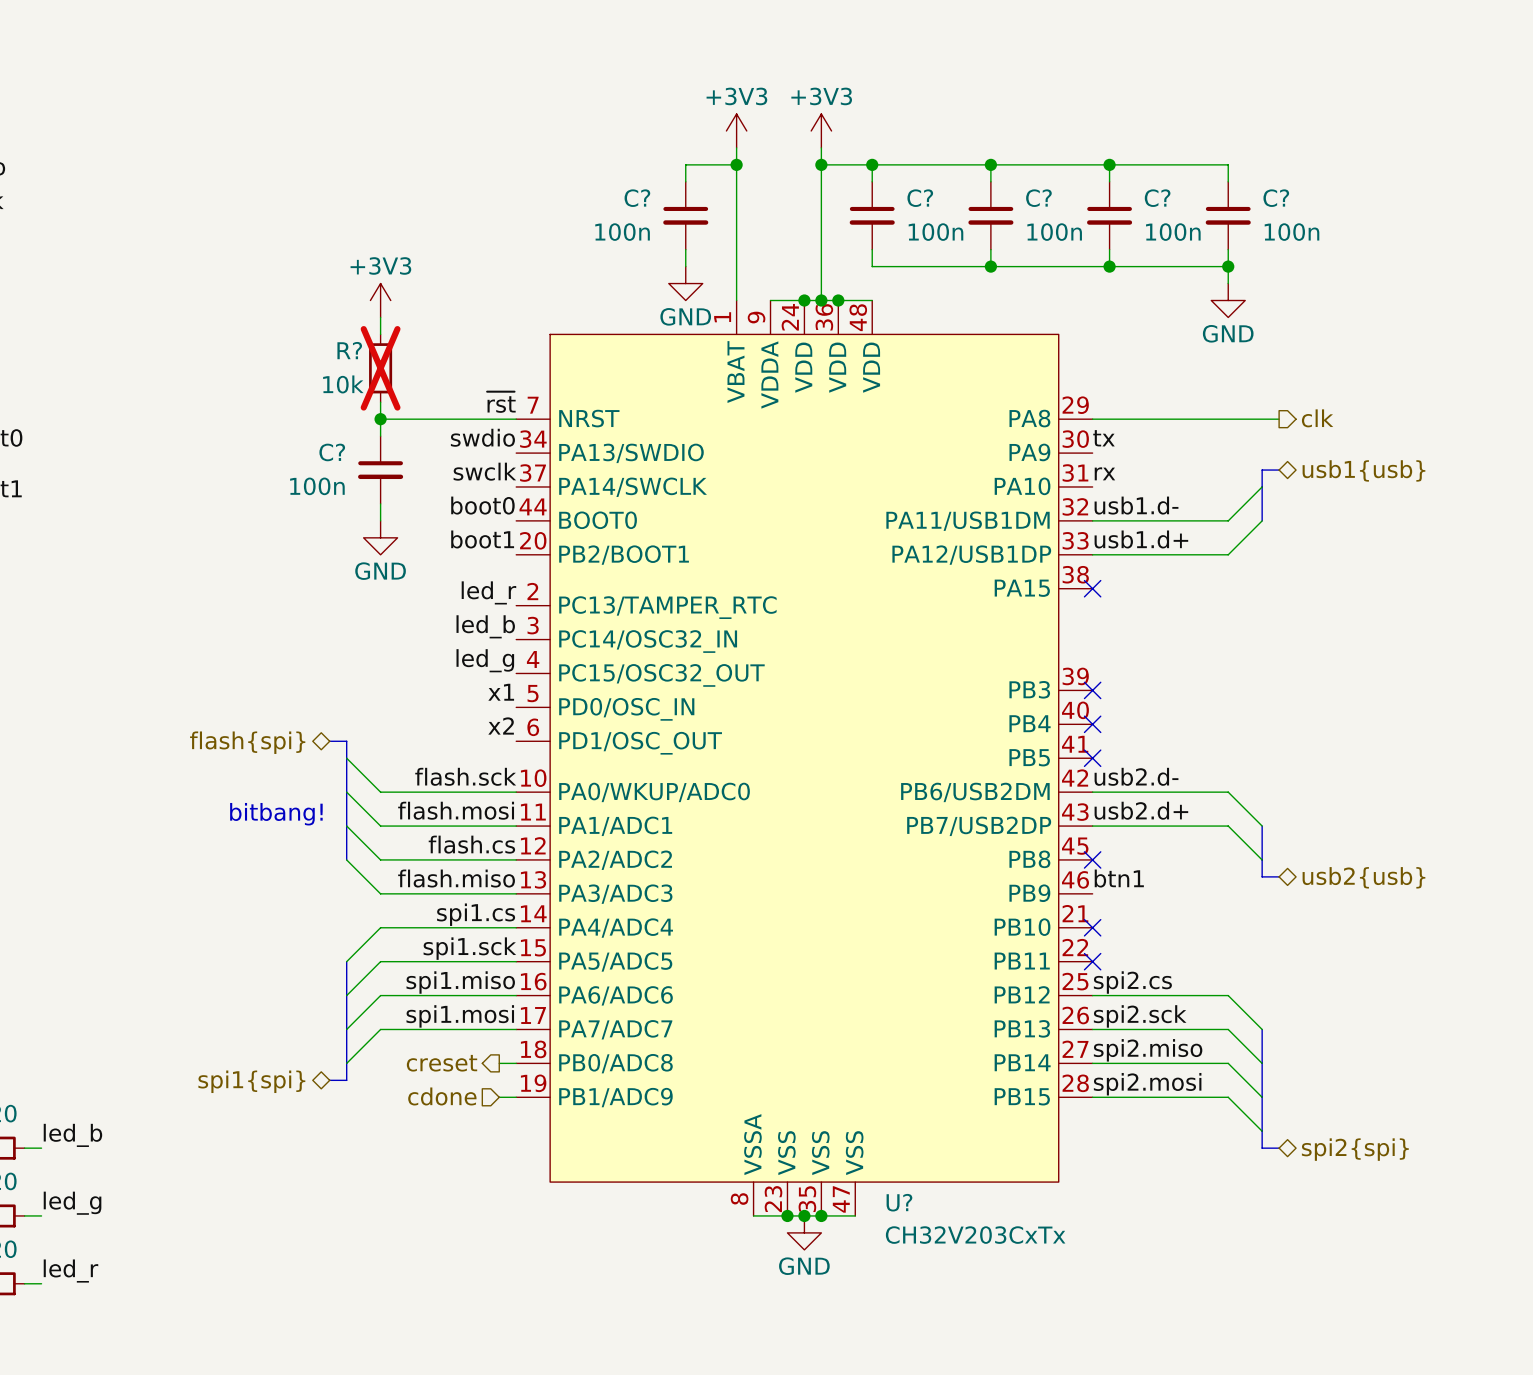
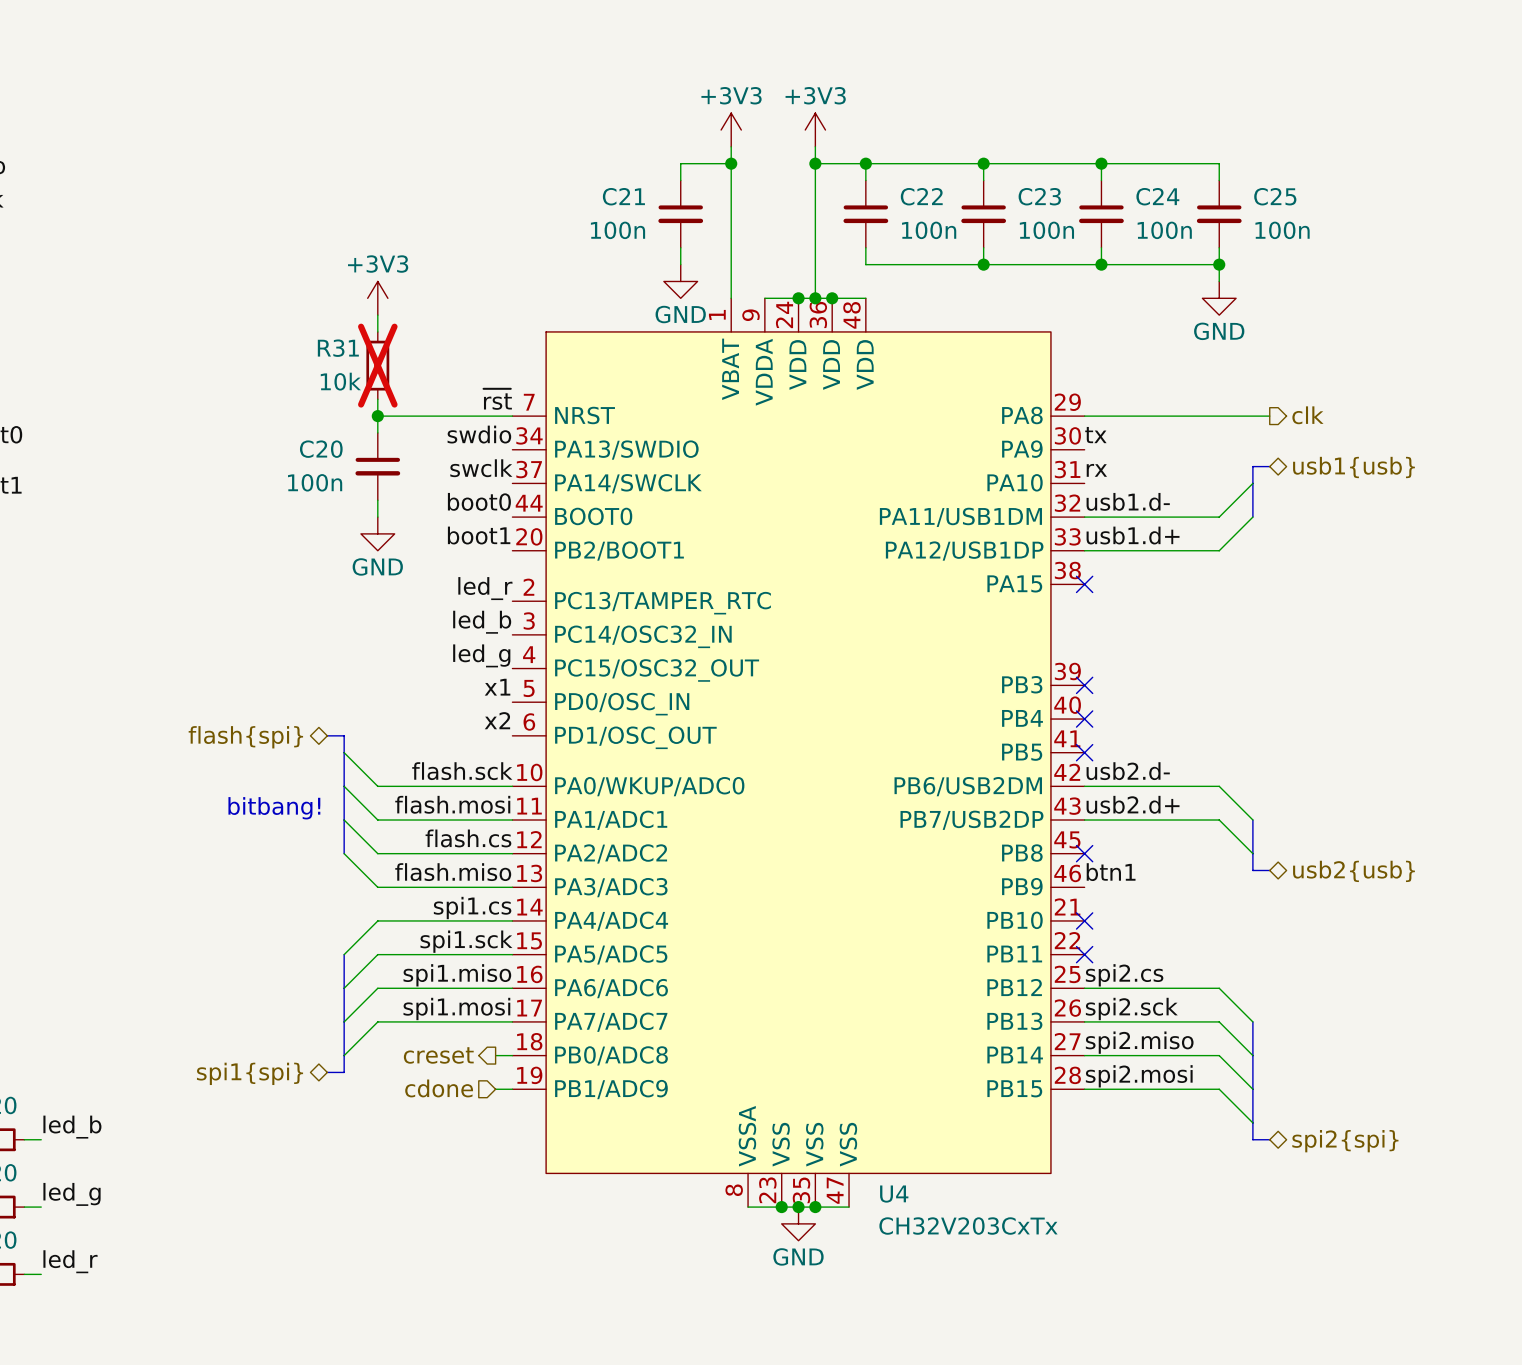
C? name: C? (637, 198) -> C21 (623, 196)
C? name: C? (920, 198) -> C22 (921, 196)
C? name: C? (1038, 198) -> C23 (1039, 196)
C? name: C? (1157, 198) -> C24 (1157, 196)
C? name: C? (1276, 198) -> C25 (1275, 196)
R? name: R? (349, 350) -> R31 (338, 348)
C? name: C? (332, 452) -> C20 (321, 449)
U? name: U? (899, 1202) -> U4 (894, 1194)

